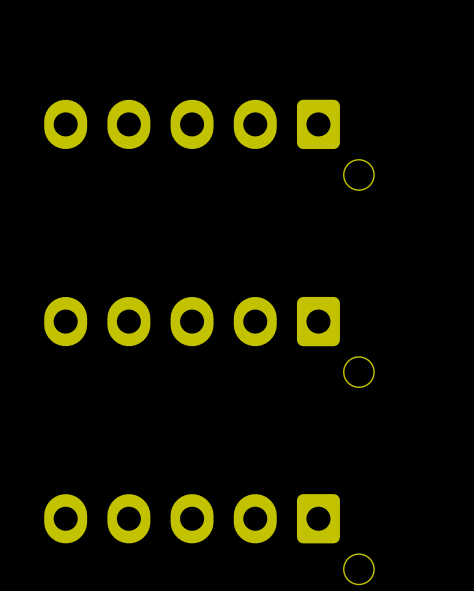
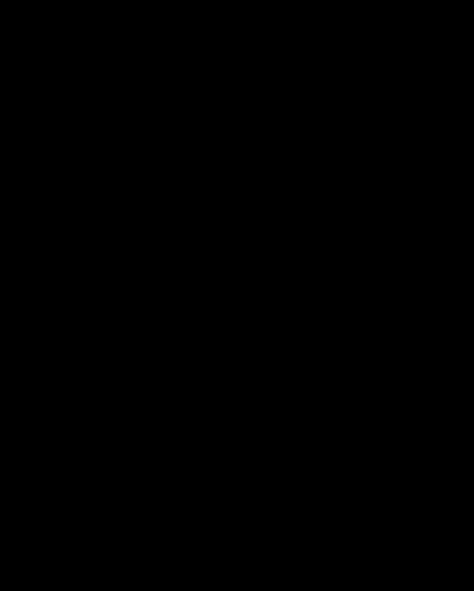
part: (209, 144) -> none
part: (209, 342) -> none
part: (209, 539) -> none

